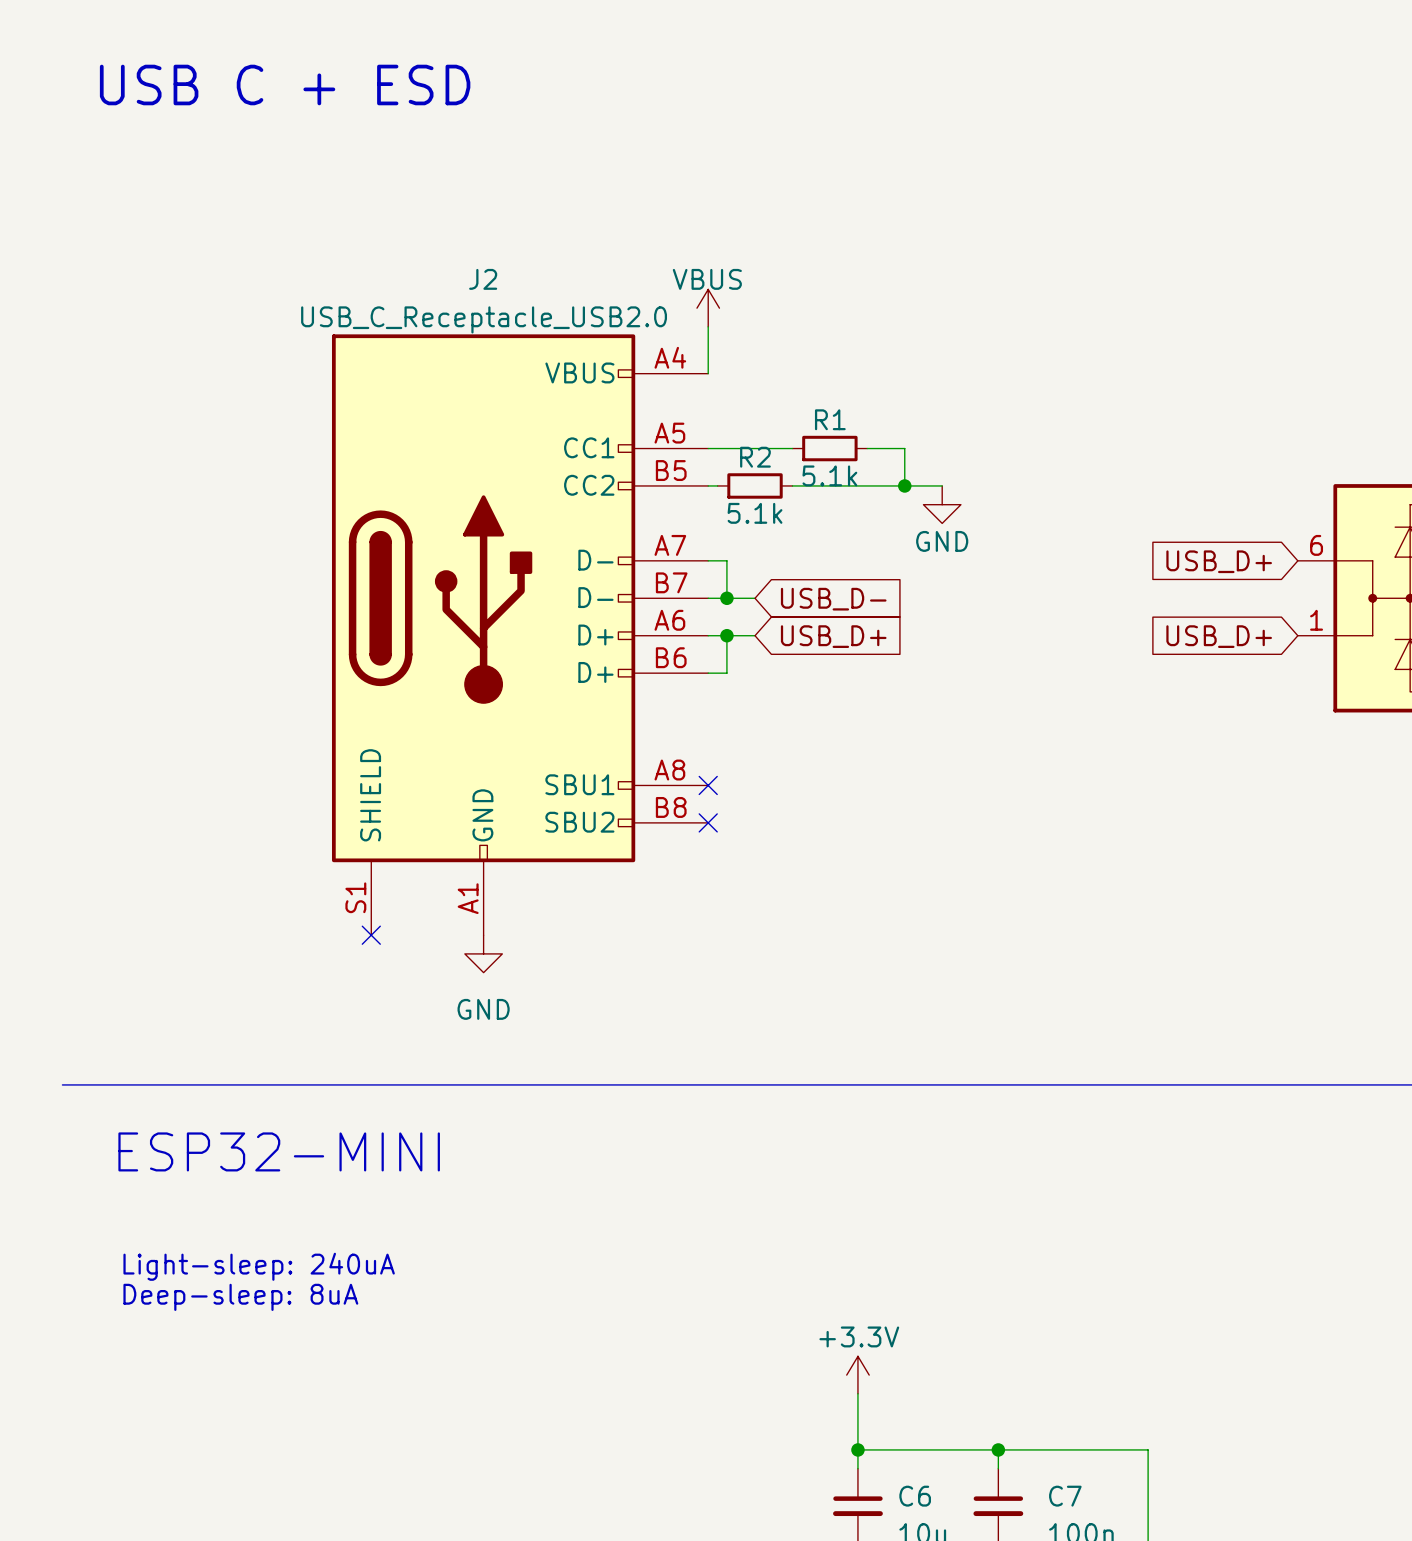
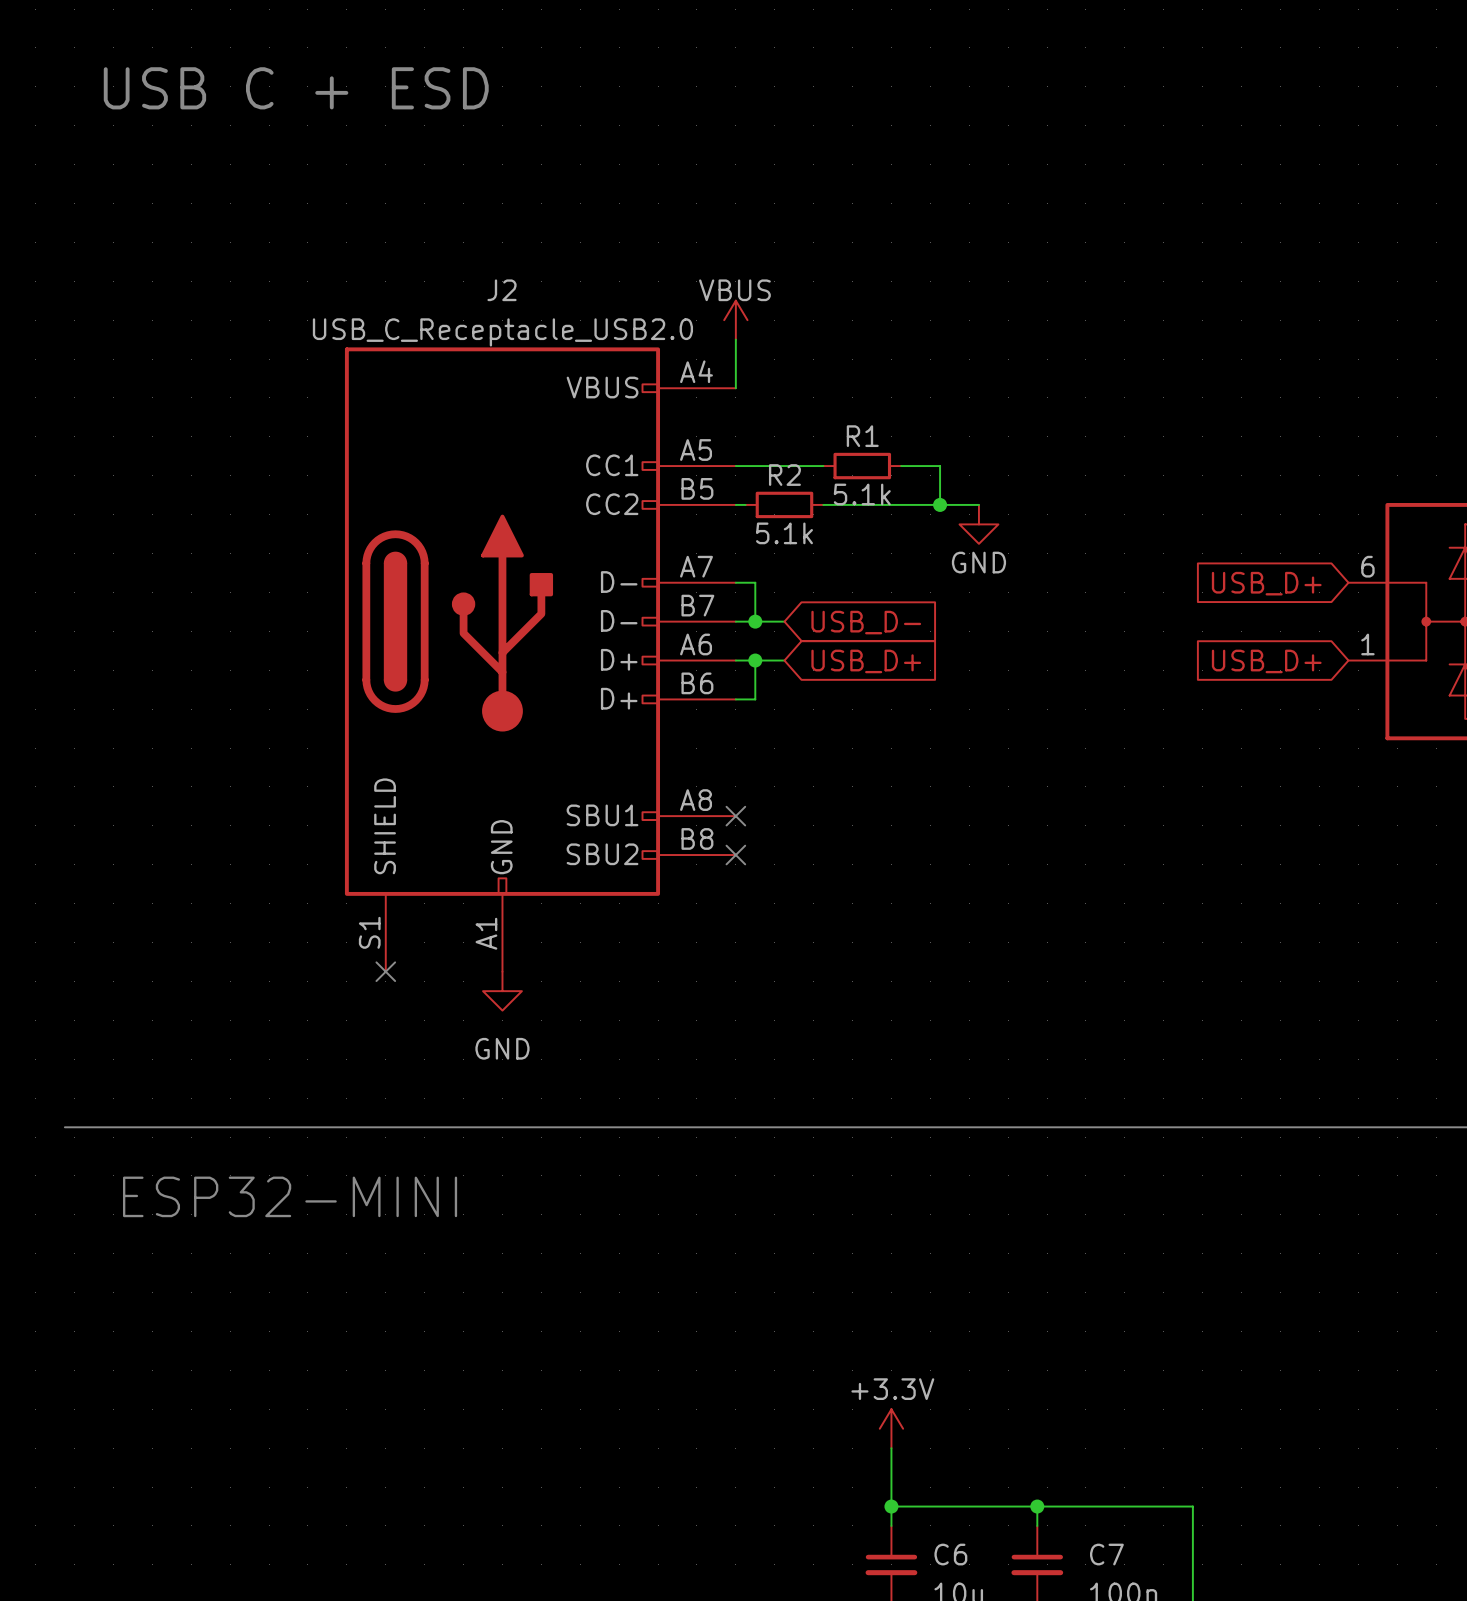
text: Light-sleep: 240uA (259, 1266) -> none
text: Deep-sleep: 8uA (240, 1297) -> none

